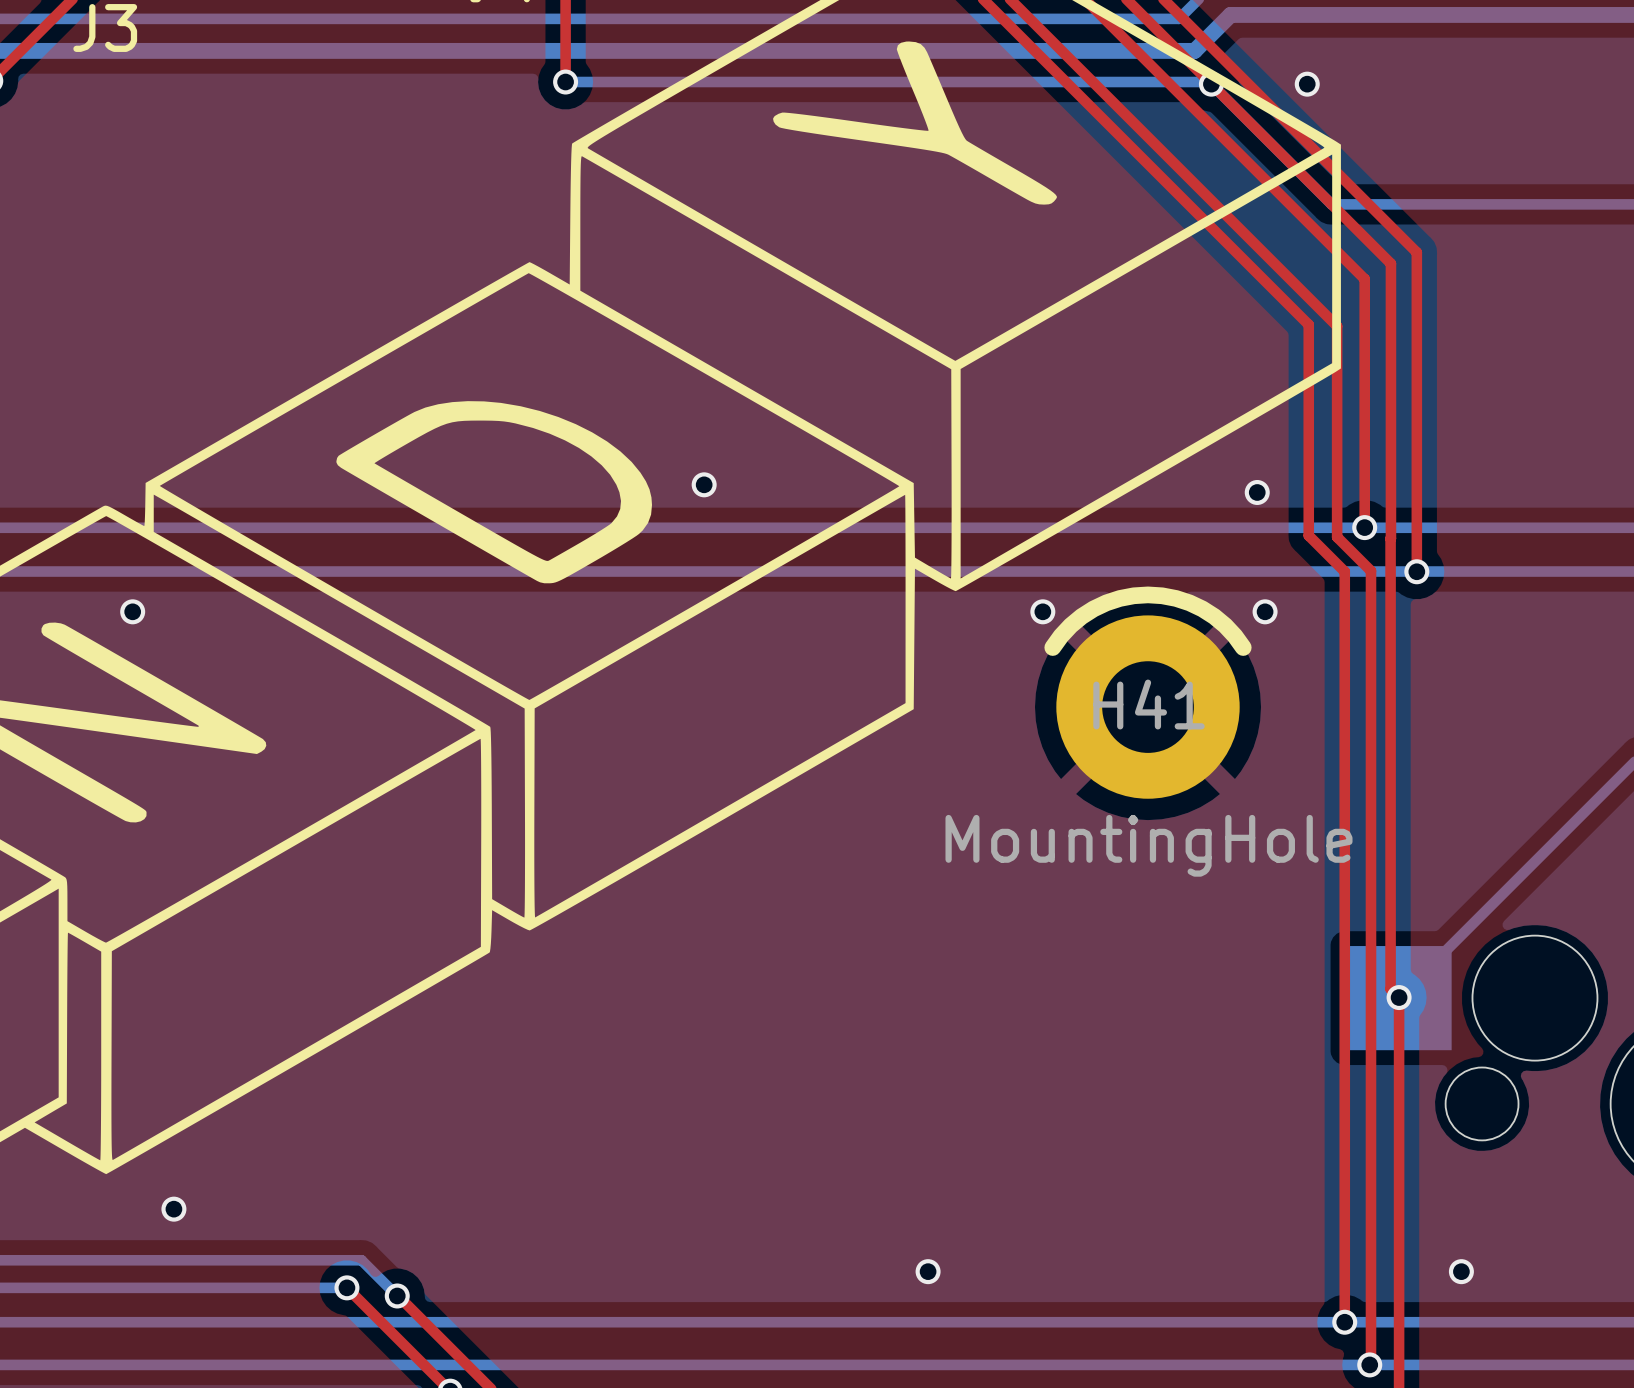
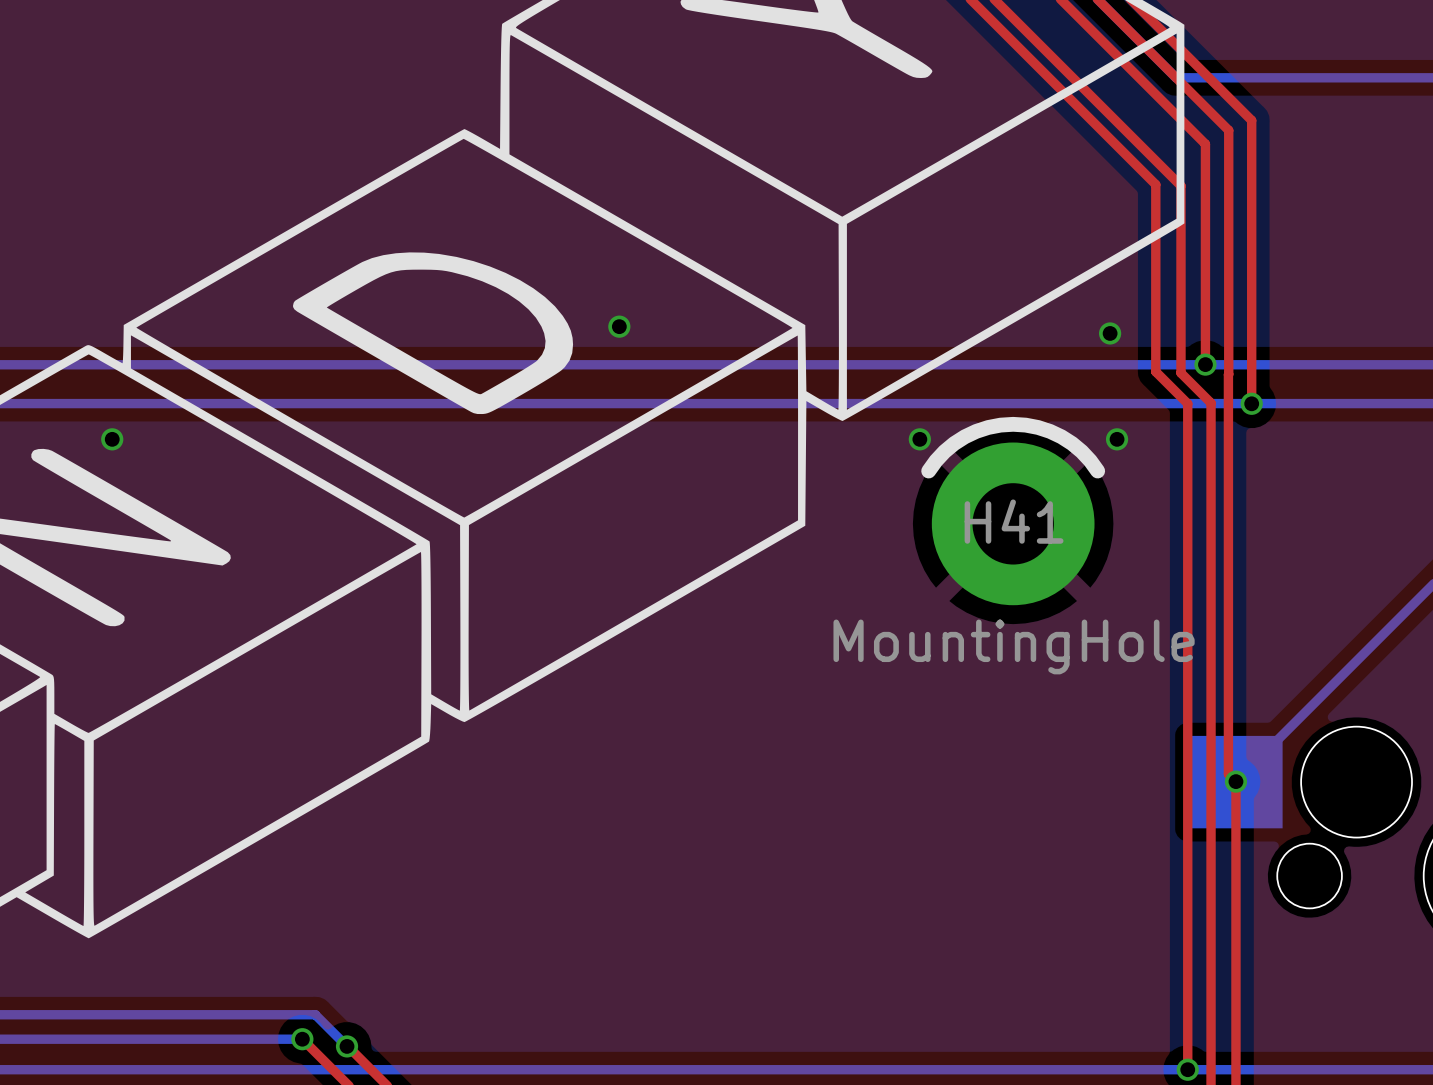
via: (173, 1209) -> none
via: (928, 1271) -> none
via: (1461, 1271) -> none

